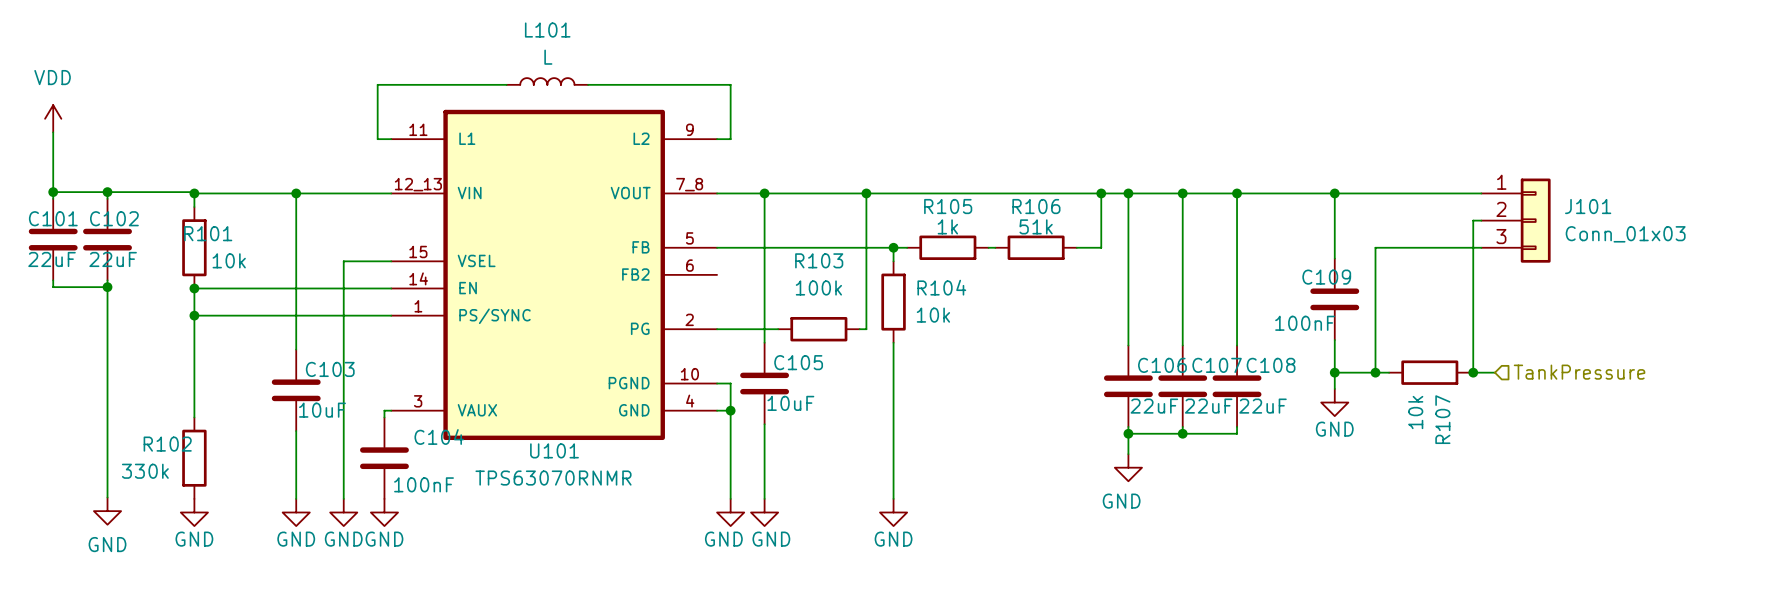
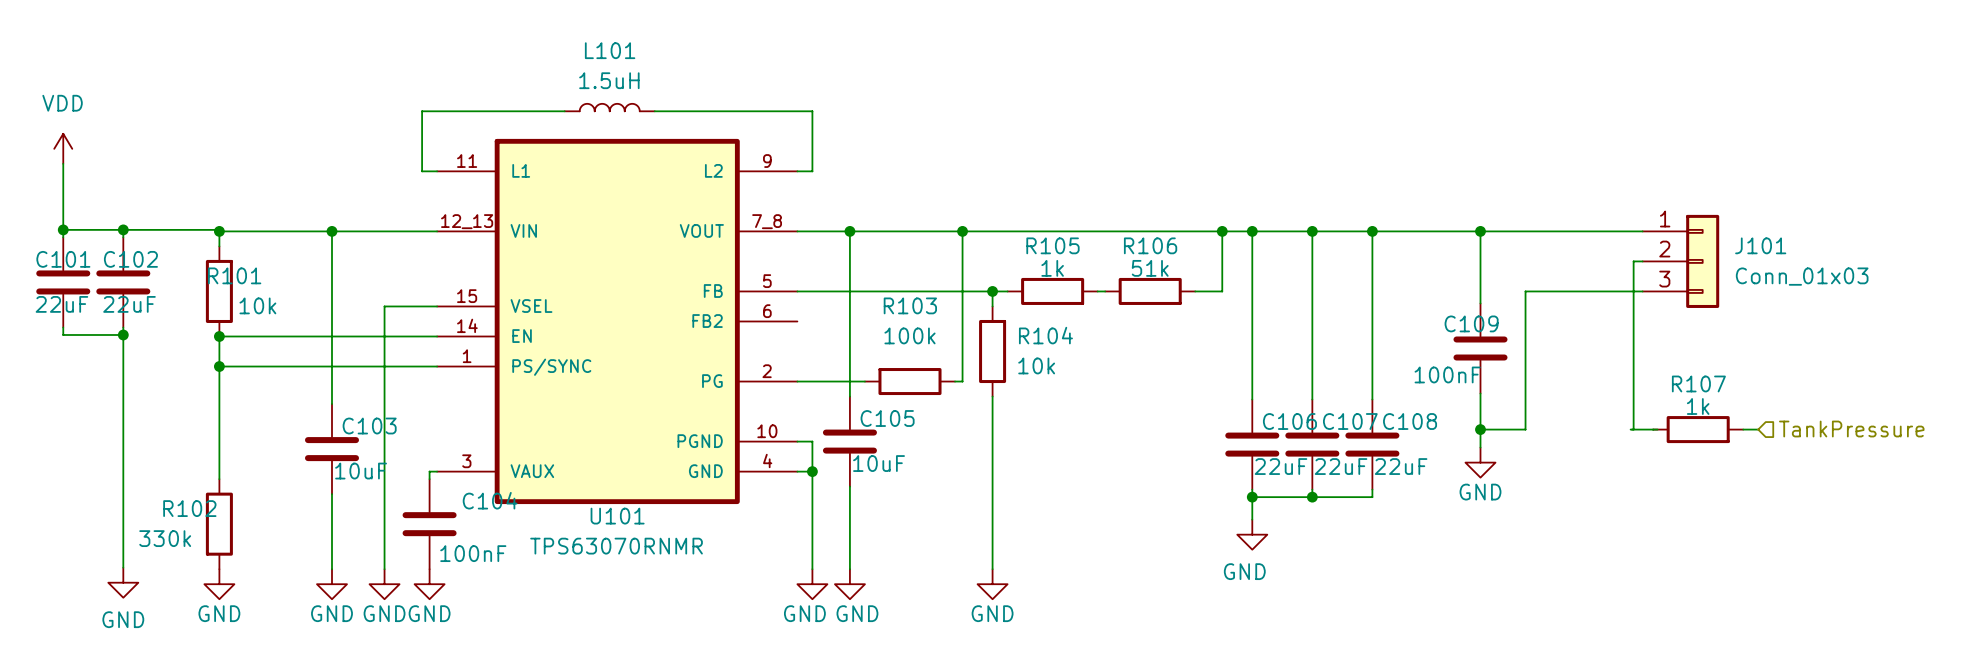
L101 value: L (548, 57) -> 1.5uH (609, 80)
wire: (1375, 372) (1389, 372) -> (1743, 429) (1758, 429)
junction: (1375, 372) -> none
R107 position: (1429, 372) -> (1698, 429)
junction: (1473, 372) -> none
hierarchical label position: TankPressure (1579, 372) -> TankPressure (1851, 429)
R107 value: 10k (1415, 412) -> 1k (1698, 406)
R107 name rotation: 0° (1442, 419) -> 90° clockwise (1698, 383)
R107 name position: R107 (1442, 419) -> R107 (1698, 383)

